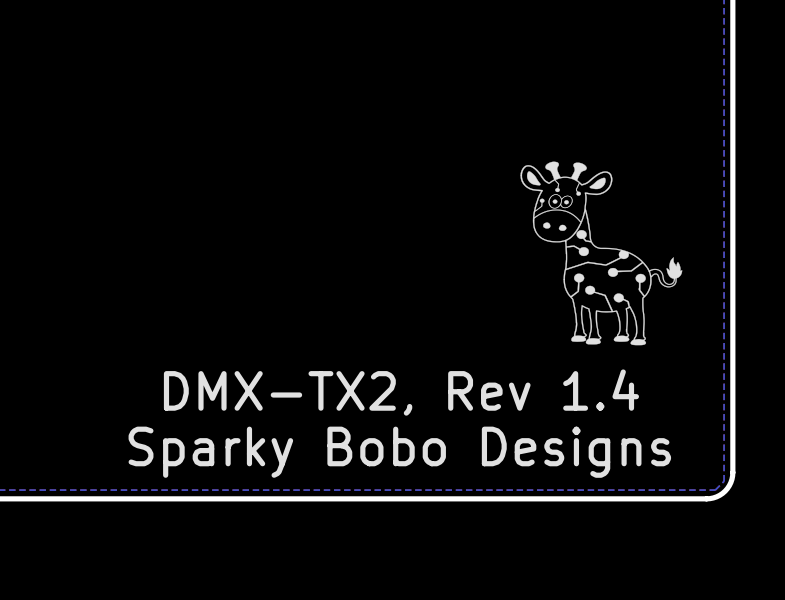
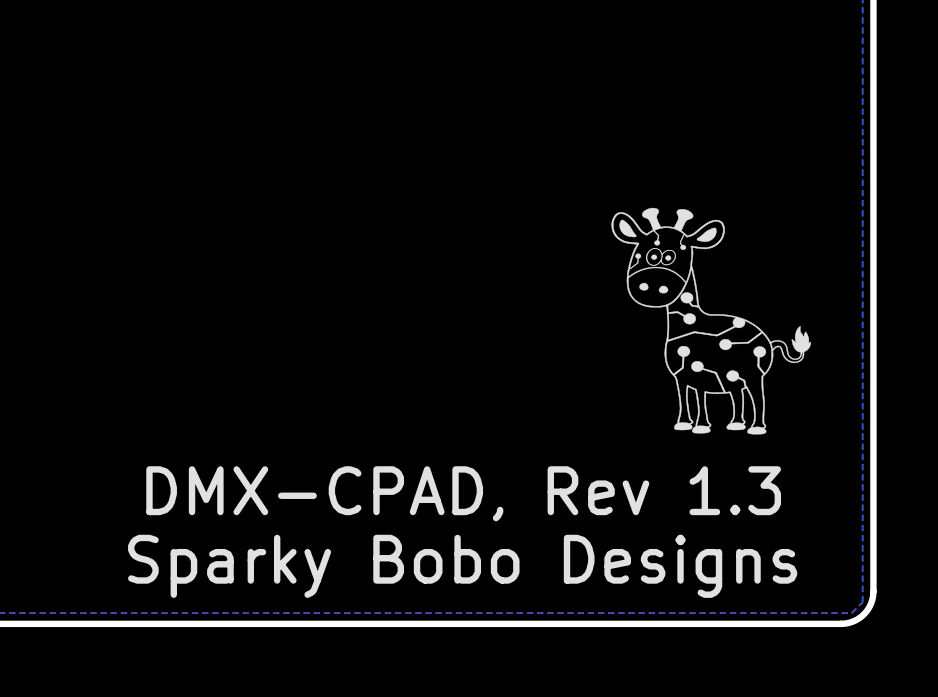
text: DMX-TX2, Rev 1.4 (401, 392) -> DMX-CPAD, Rev 1.3 (463, 493)

